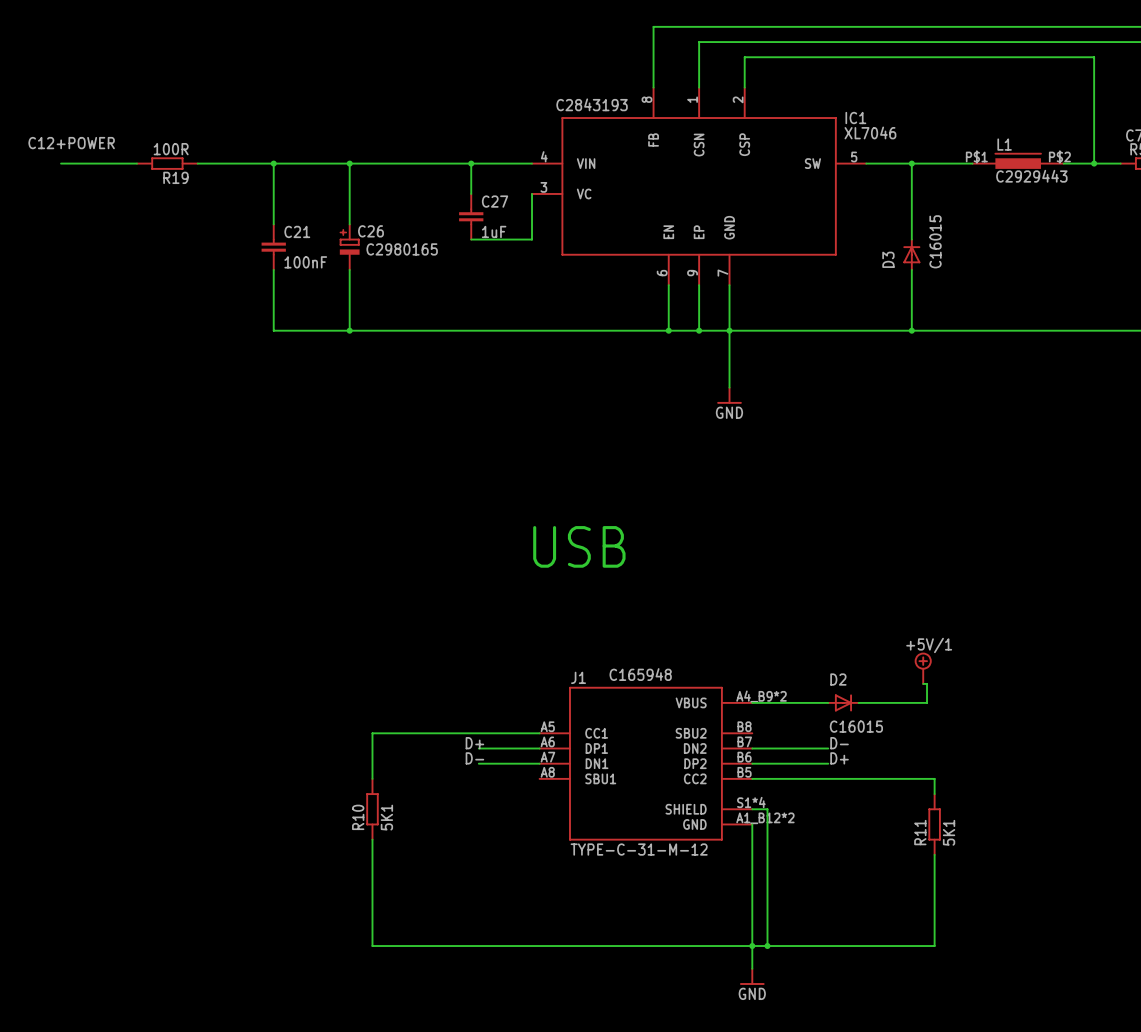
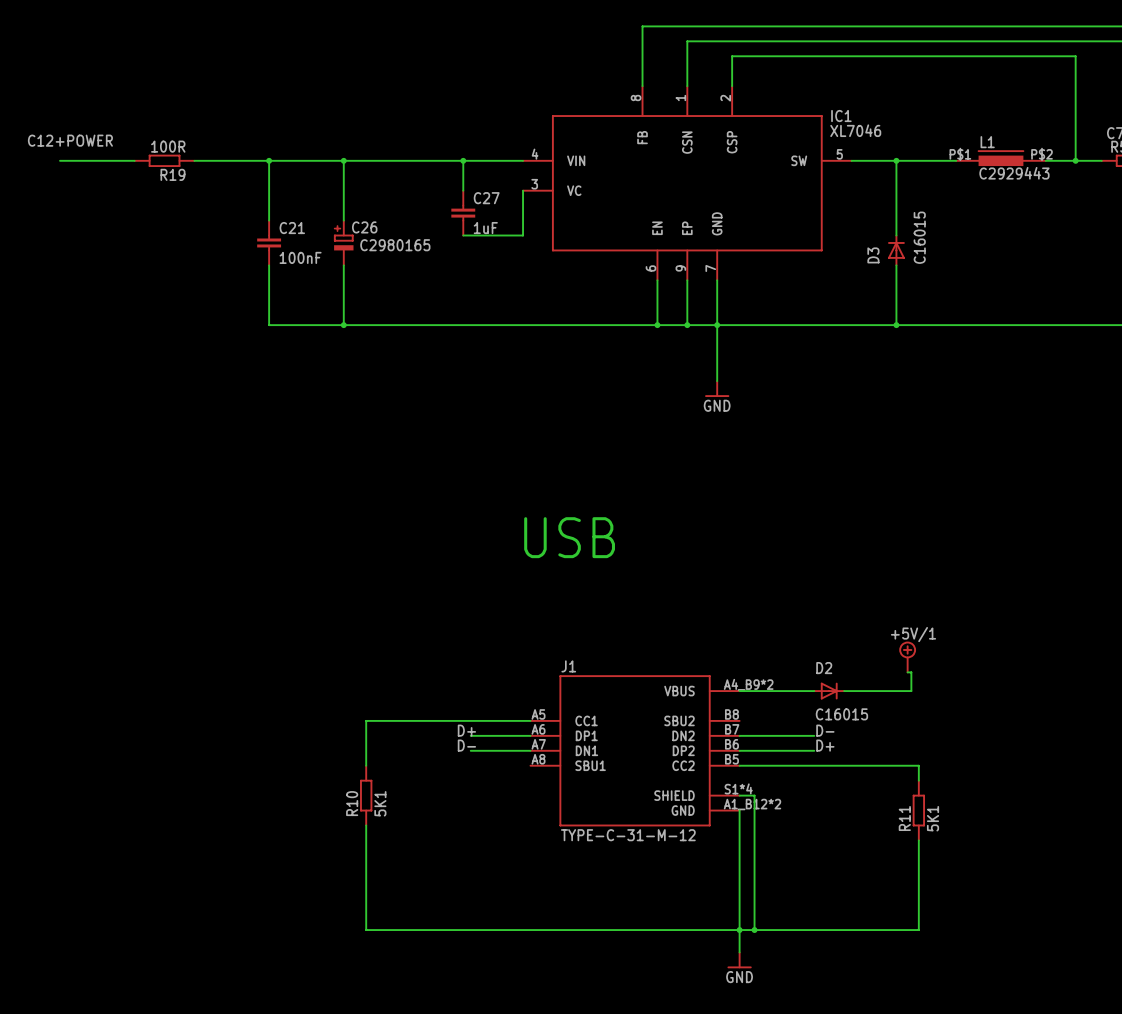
IC1 text: C2843193 (592, 104) -> none
J1 text: C165948 (640, 674) -> none

